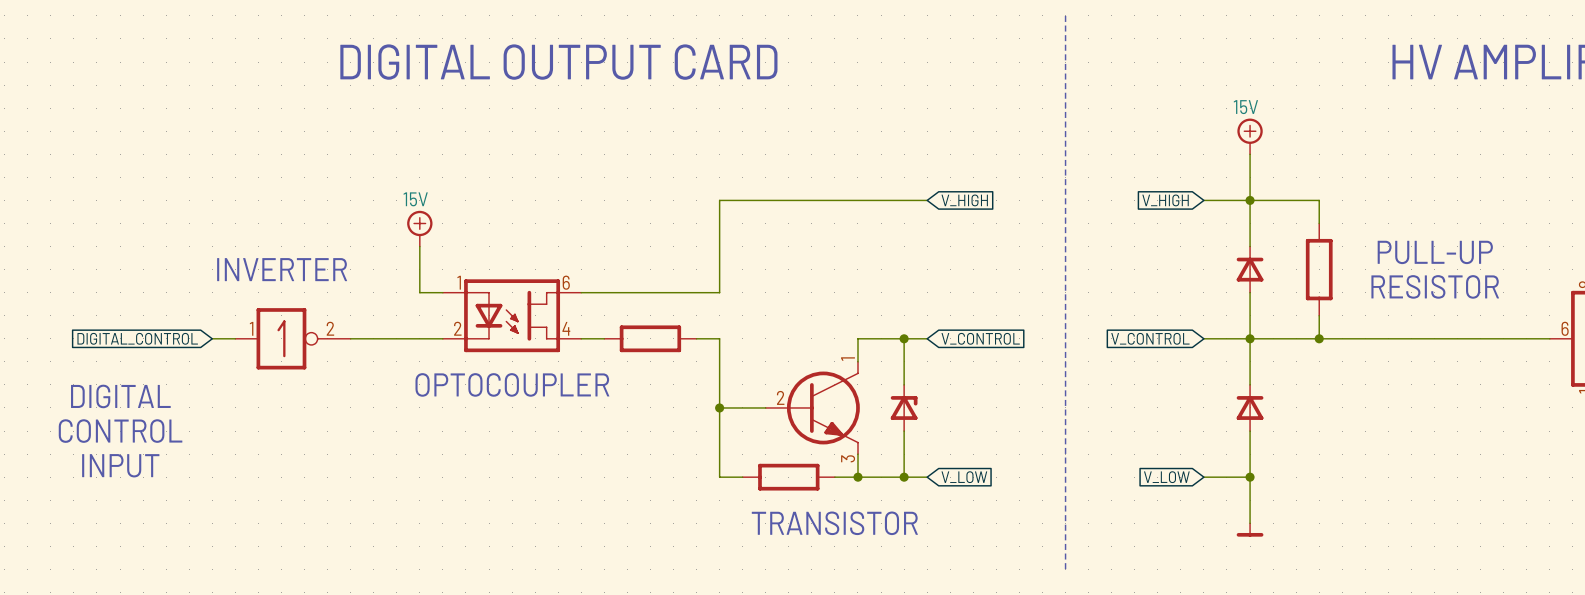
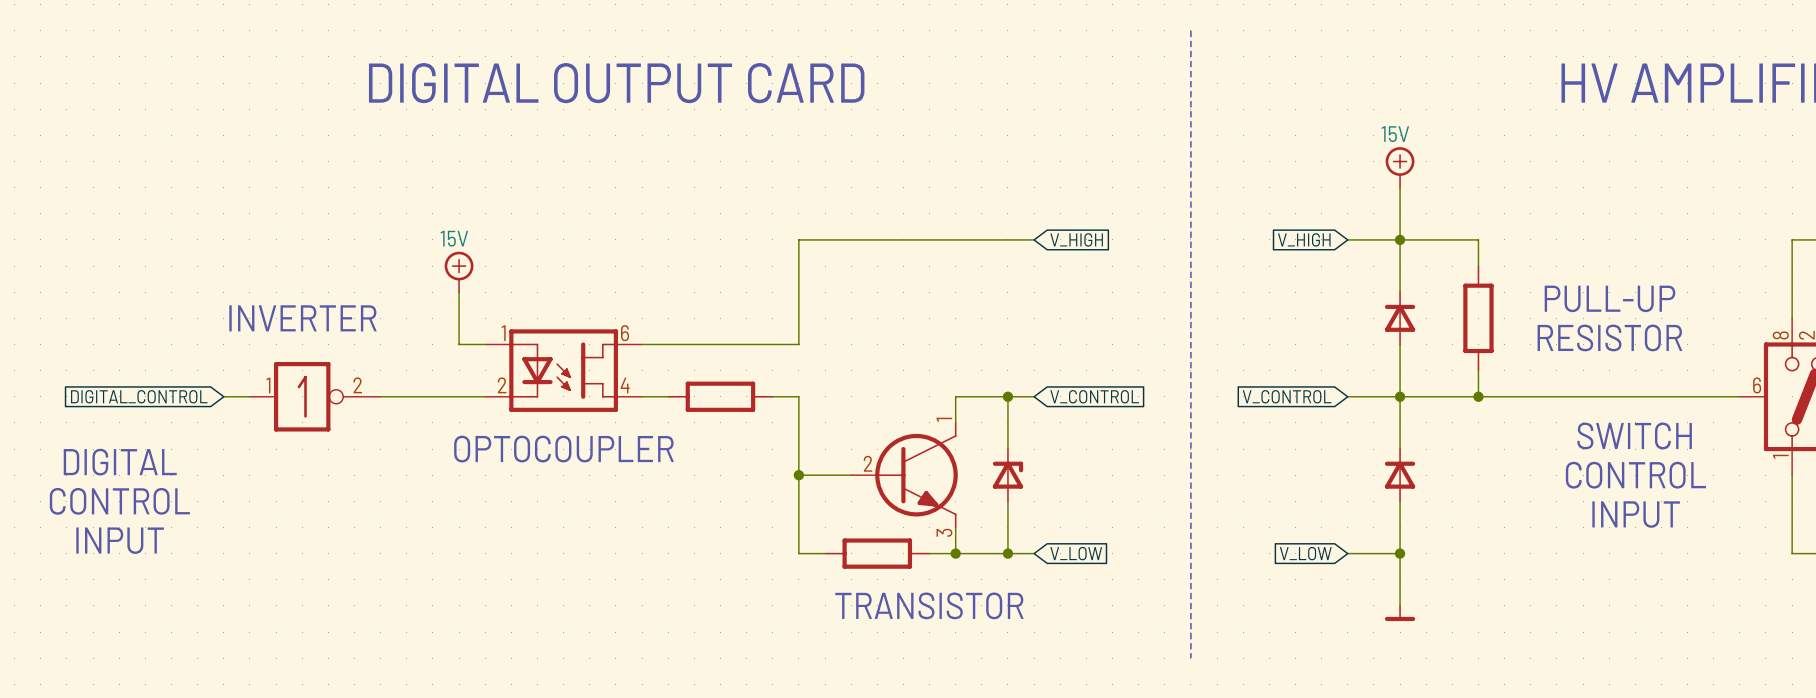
text: none -> SWITCH (1634, 436)
text: none -> CONTROL (1635, 475)
text: none -> INPUT (1636, 514)

